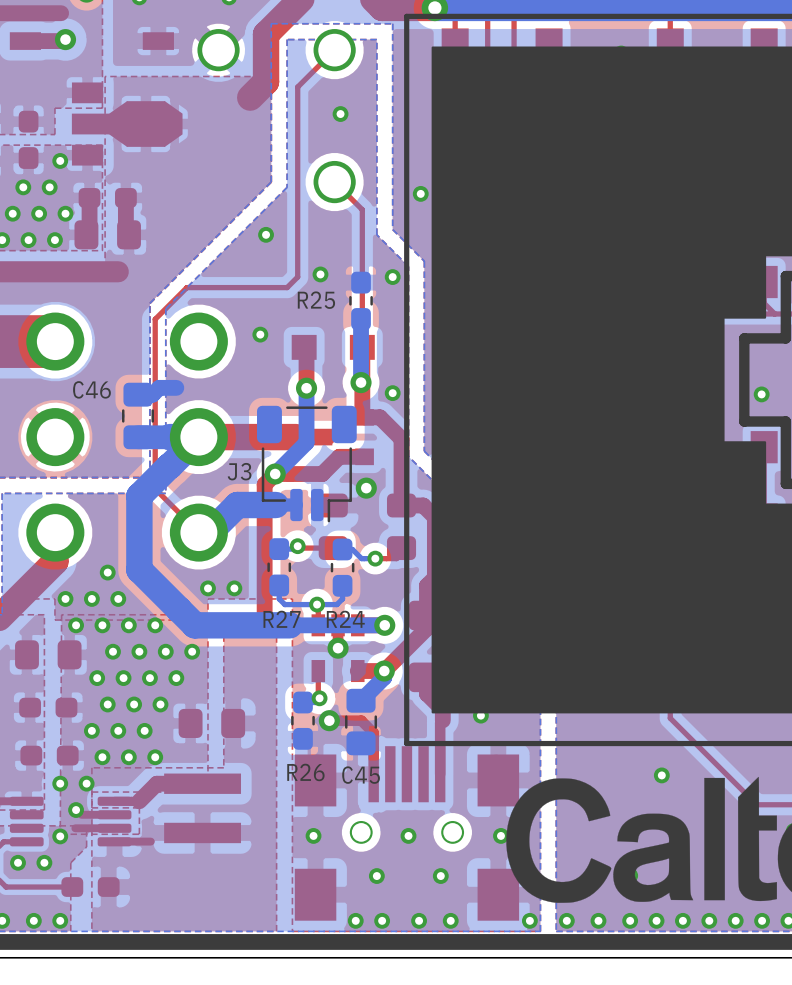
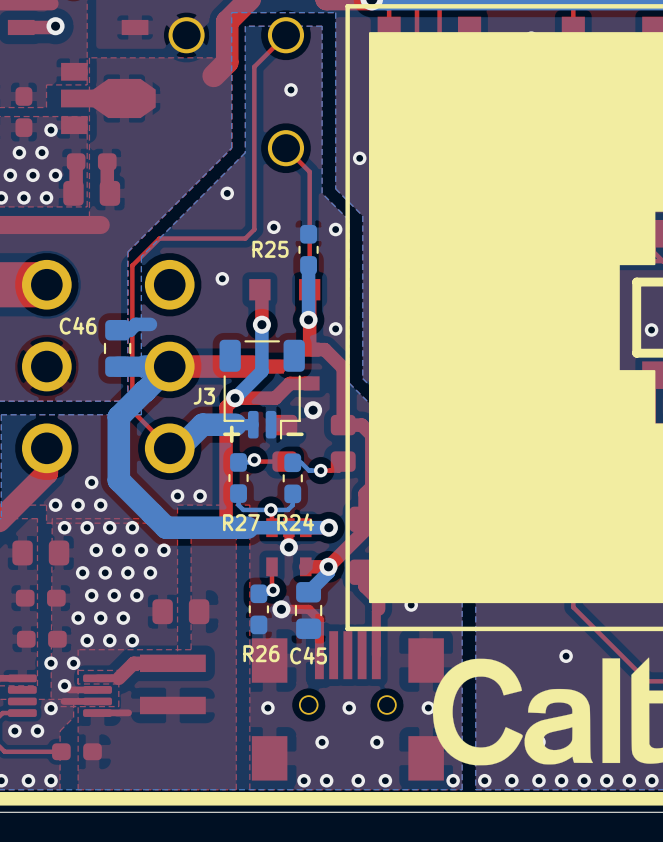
text: none -> + (231, 434)
text: none -> - (295, 434)

